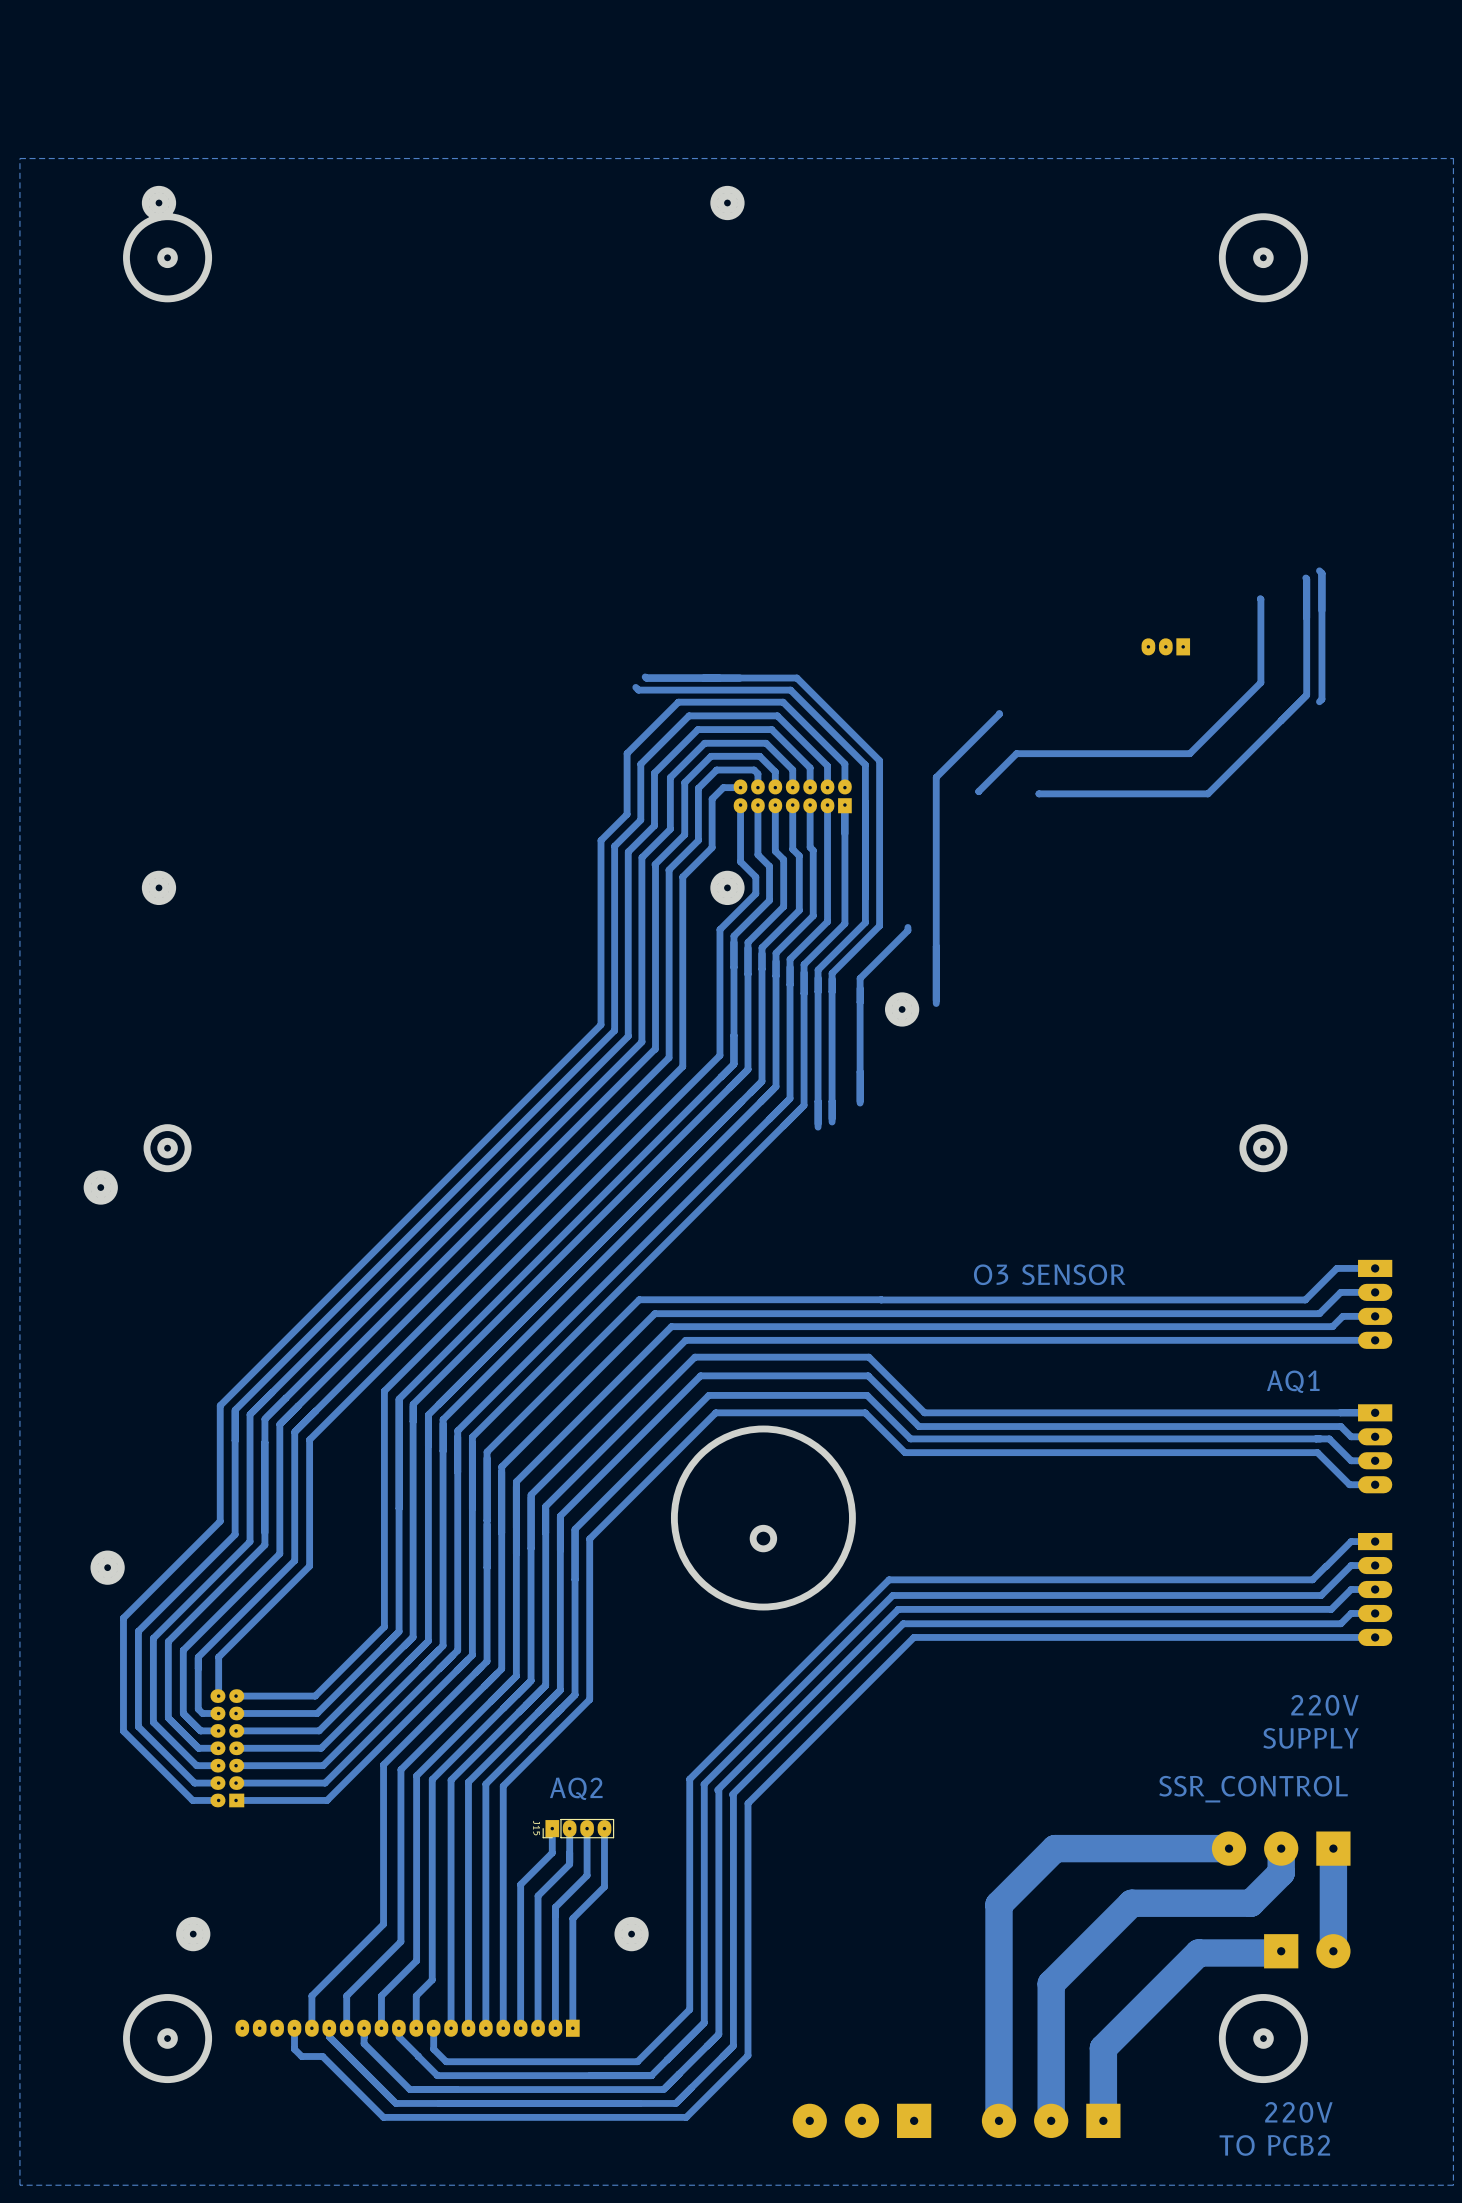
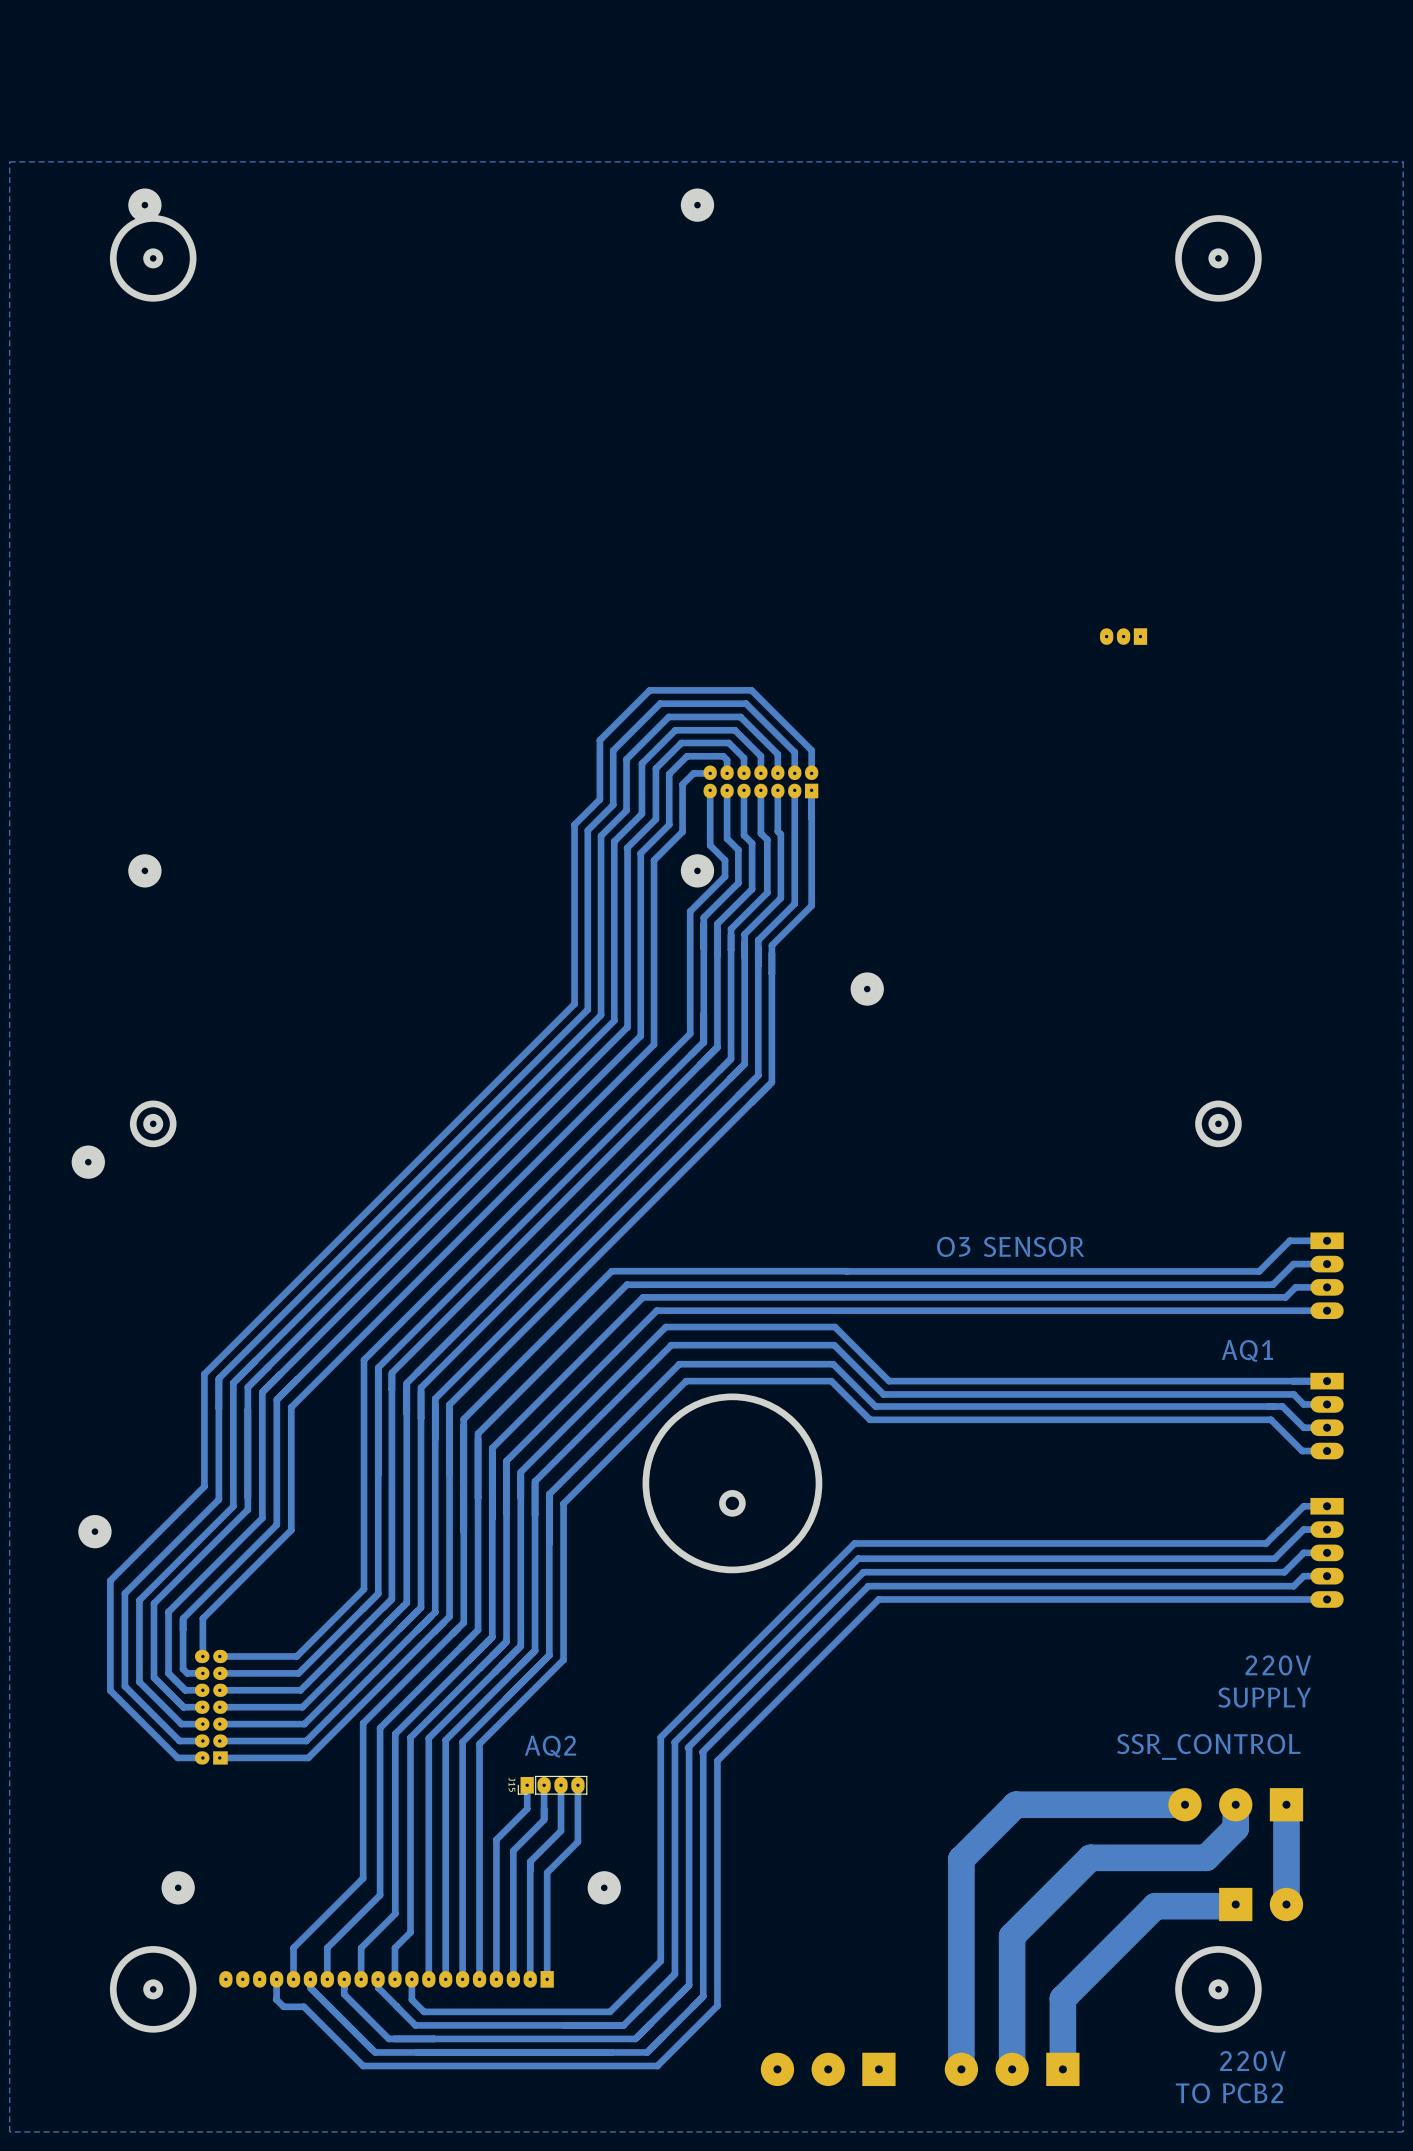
bottom track: (1319, 570) (1321, 573) (1321, 699) (1319, 701) -> none
bottom track: (1305, 578) (1306, 695) (1207, 793) -> none
bottom track: (1260, 598) (1260, 682) (1189, 753) (1016, 753) (978, 791) -> none
bottom track: (645, 676) (796, 678) (879, 760) (879, 925) (832, 973) (832, 1122) -> none
bottom track: (635, 687) (638, 690) (790, 690) (865, 764) (865, 922) (818, 969) (818, 1127) -> none
bottom track: (999, 713) (936, 777) (936, 1003) -> none
bottom track: (1207, 793) (1038, 793) -> none
bottom track: (907, 927) (907, 930) (860, 978) (860, 1103) -> none

